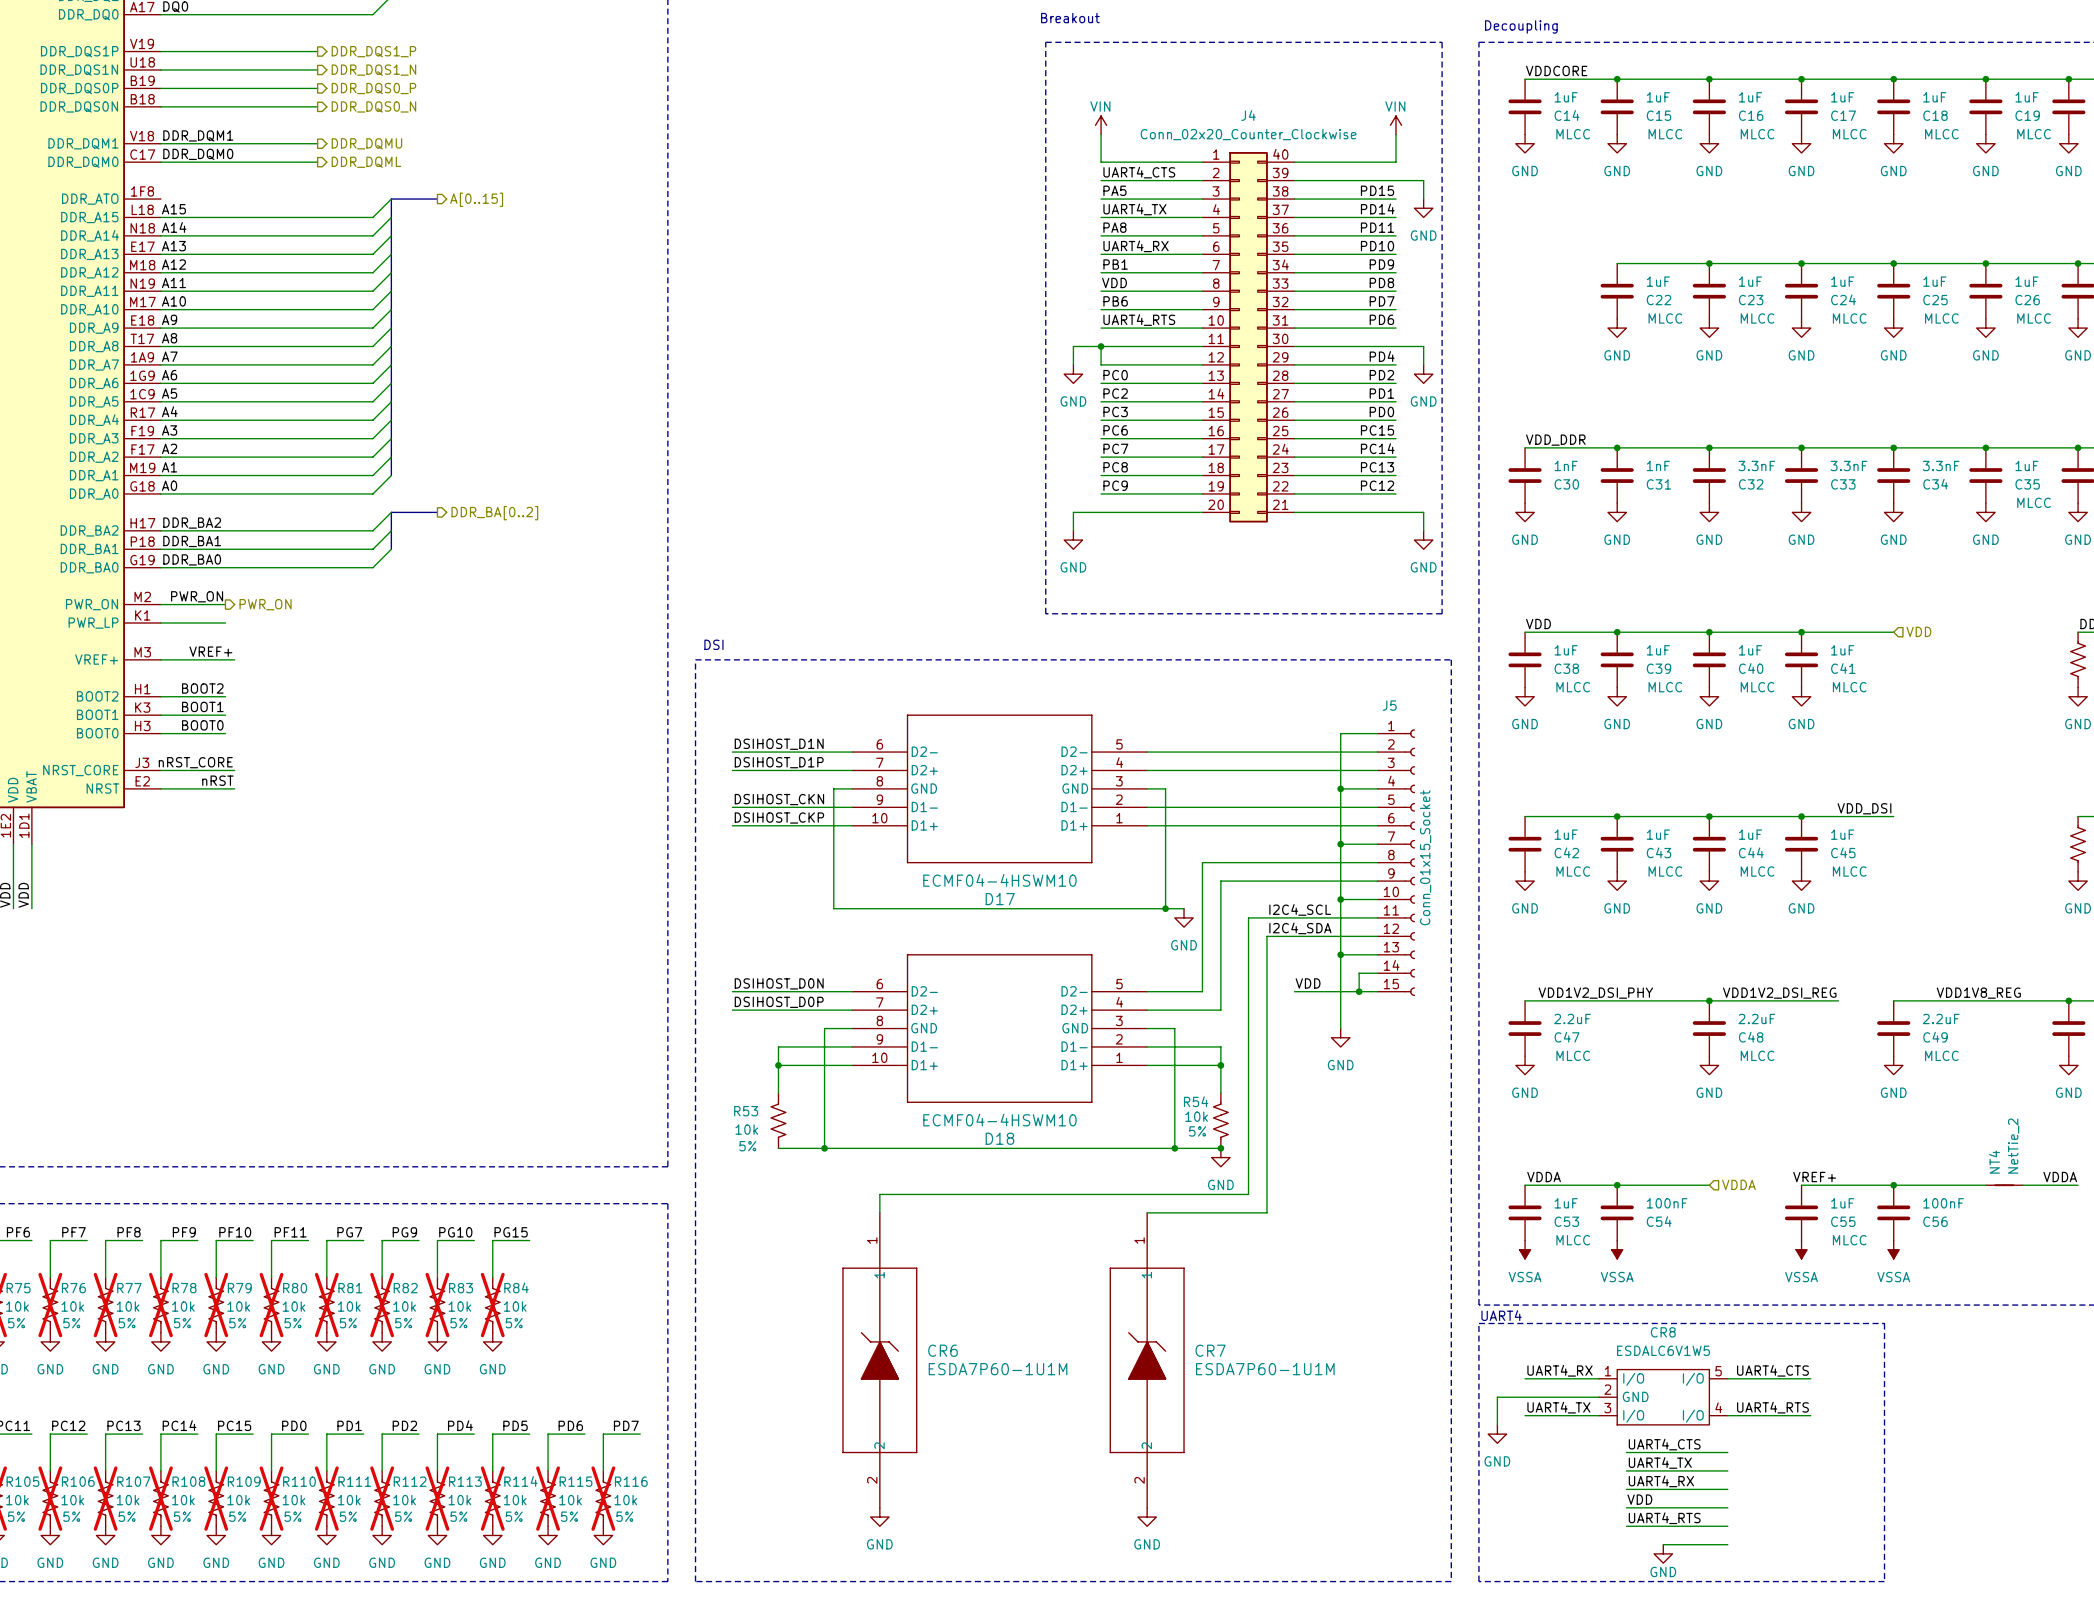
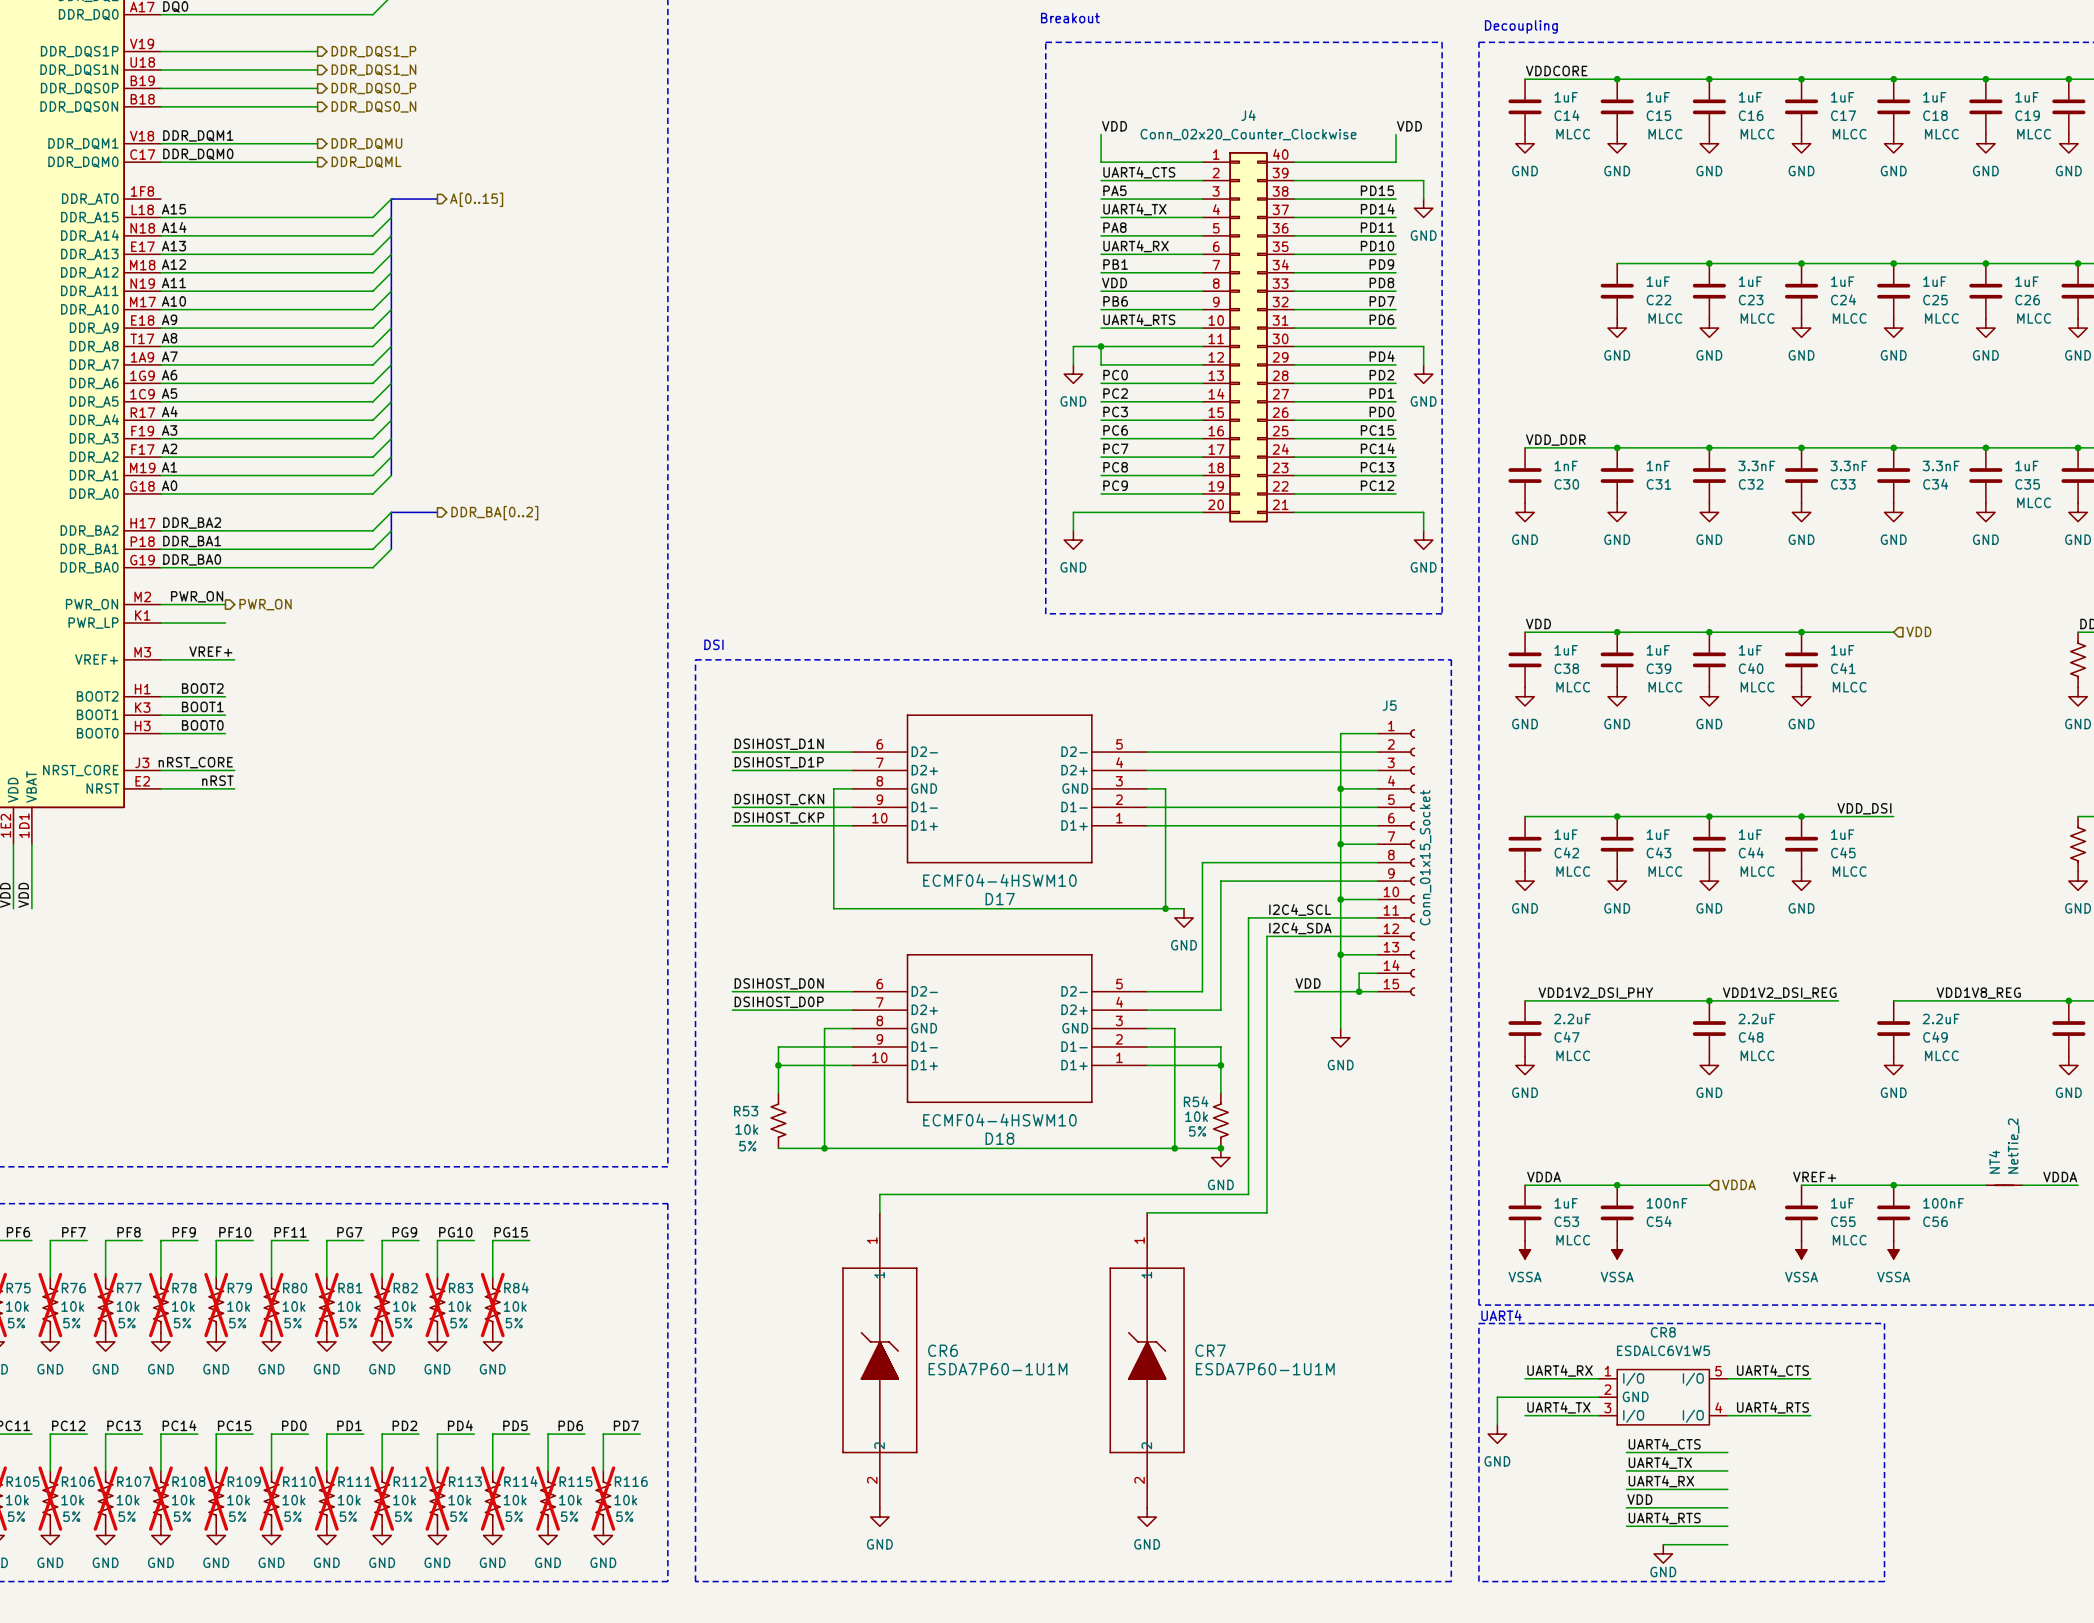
power symbol: VIN (1101, 125) -> none
power symbol: VIN (1396, 125) -> none
label: none -> VDD (1114, 126)
label: none -> VDD (1409, 126)

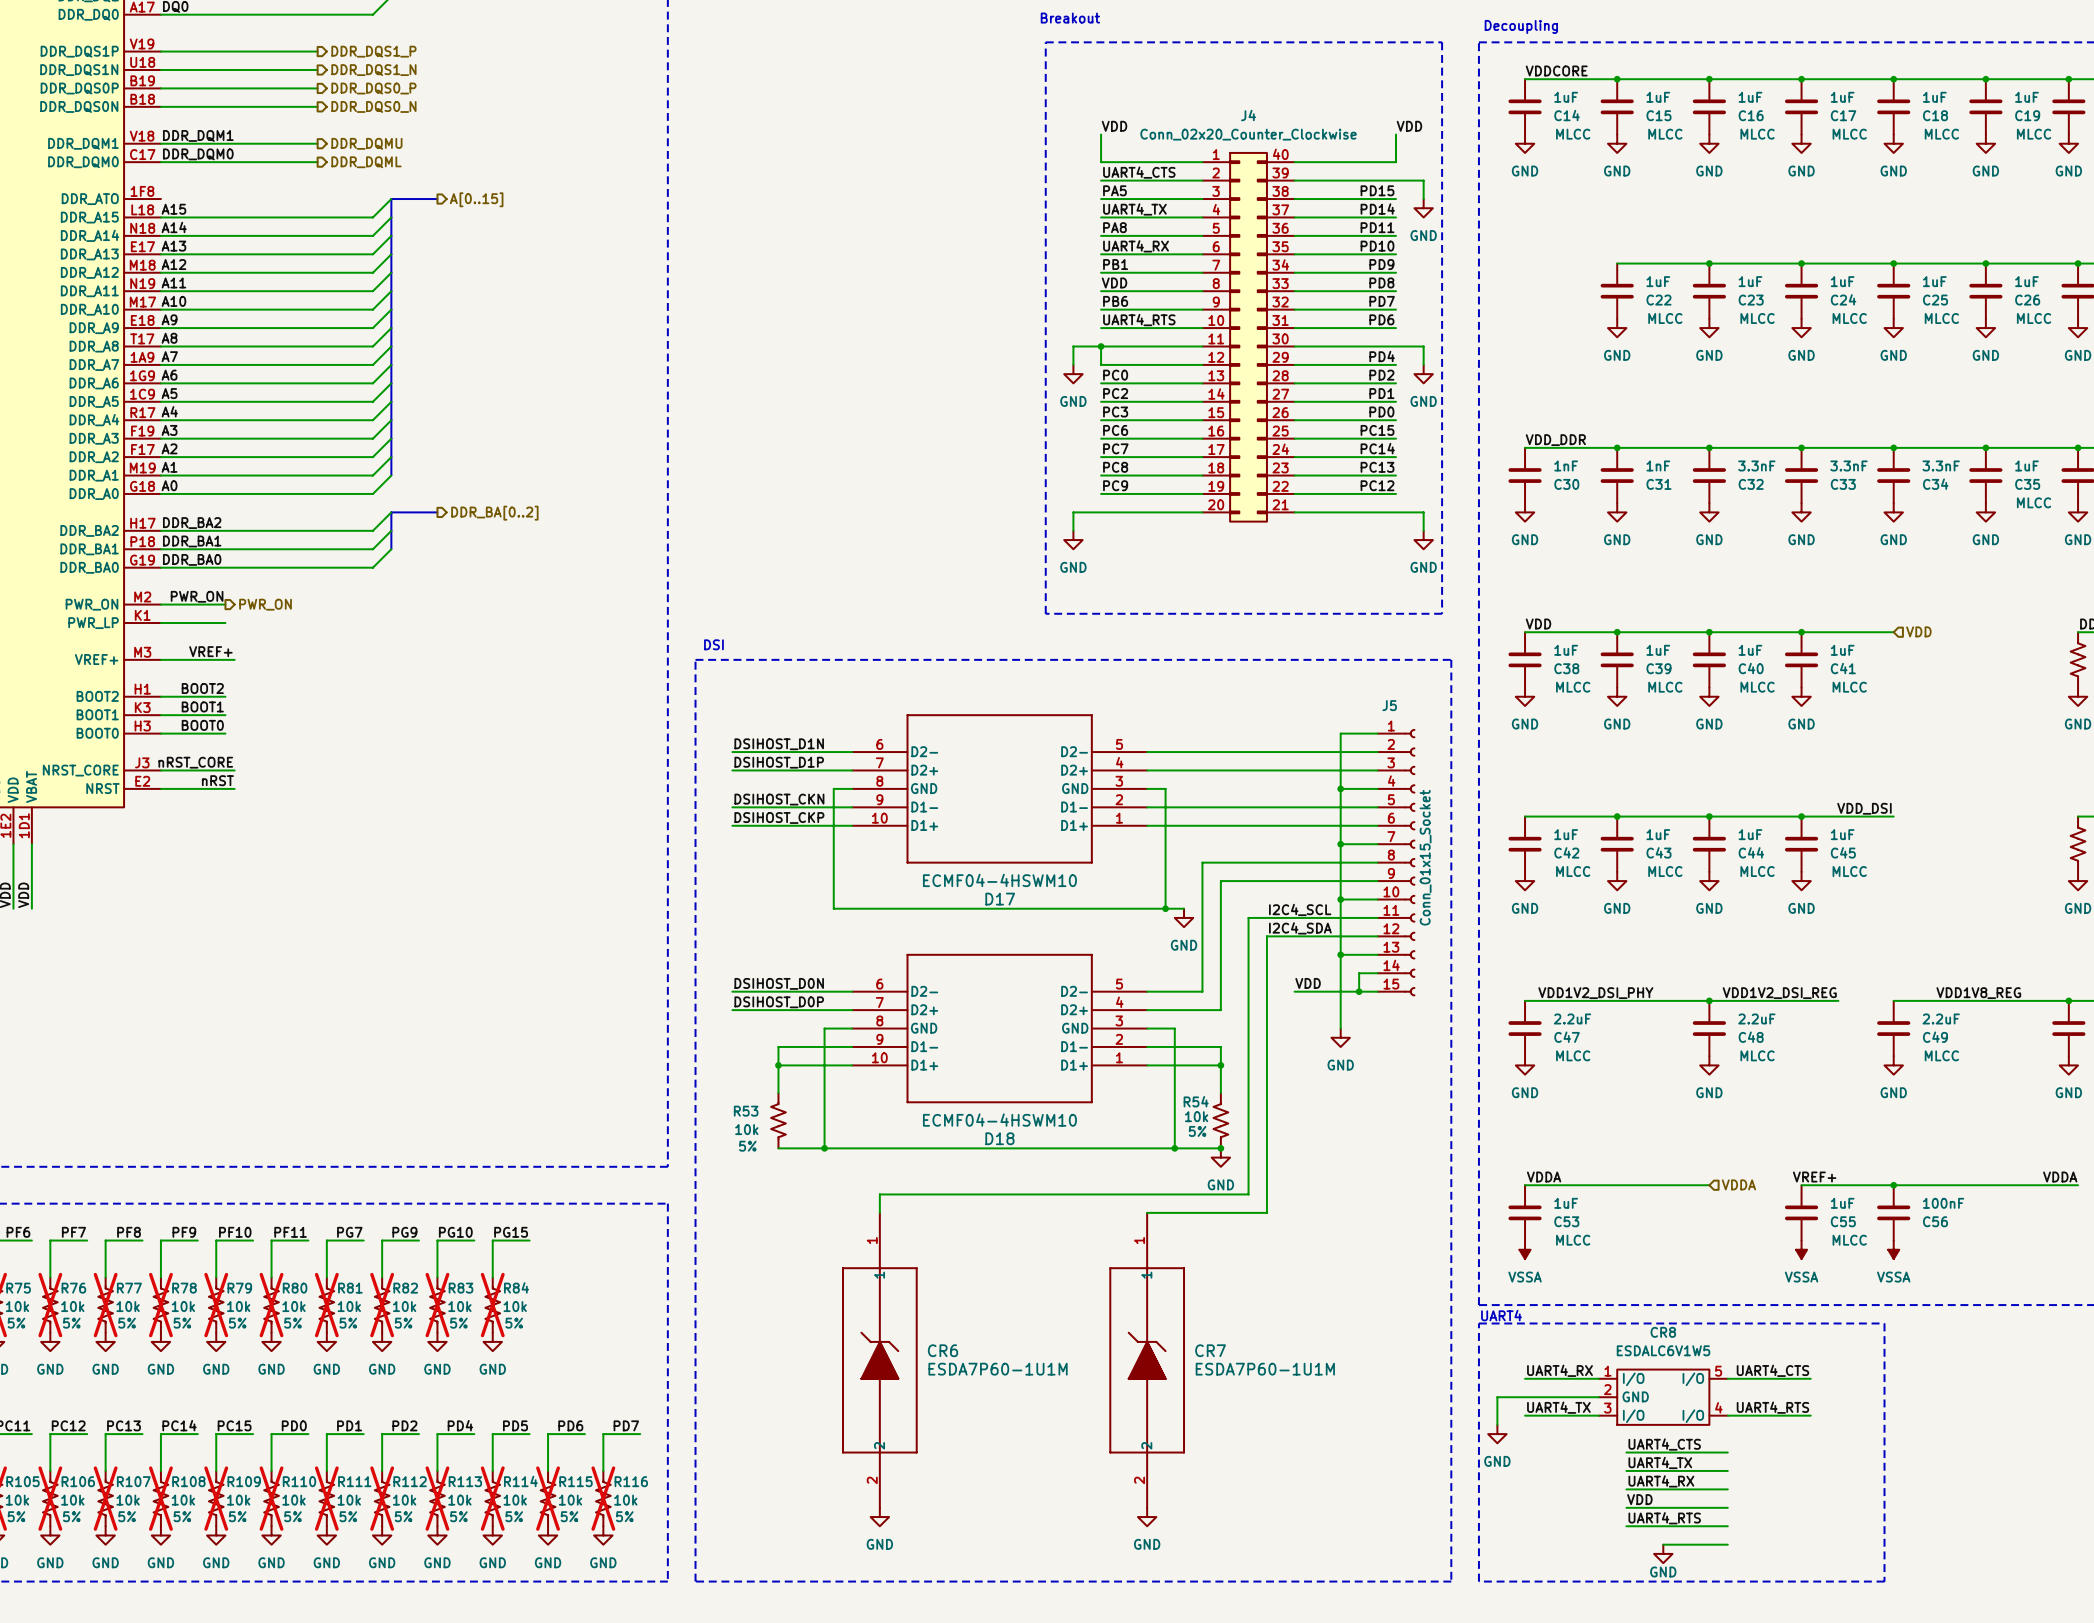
junction: (1617, 1185) -> none
NT4: NetTie_2 (2004, 1185) -> none
C54: 100nF (1617, 1212) -> none
power symbol: VSSA (1617, 1249) -> none

